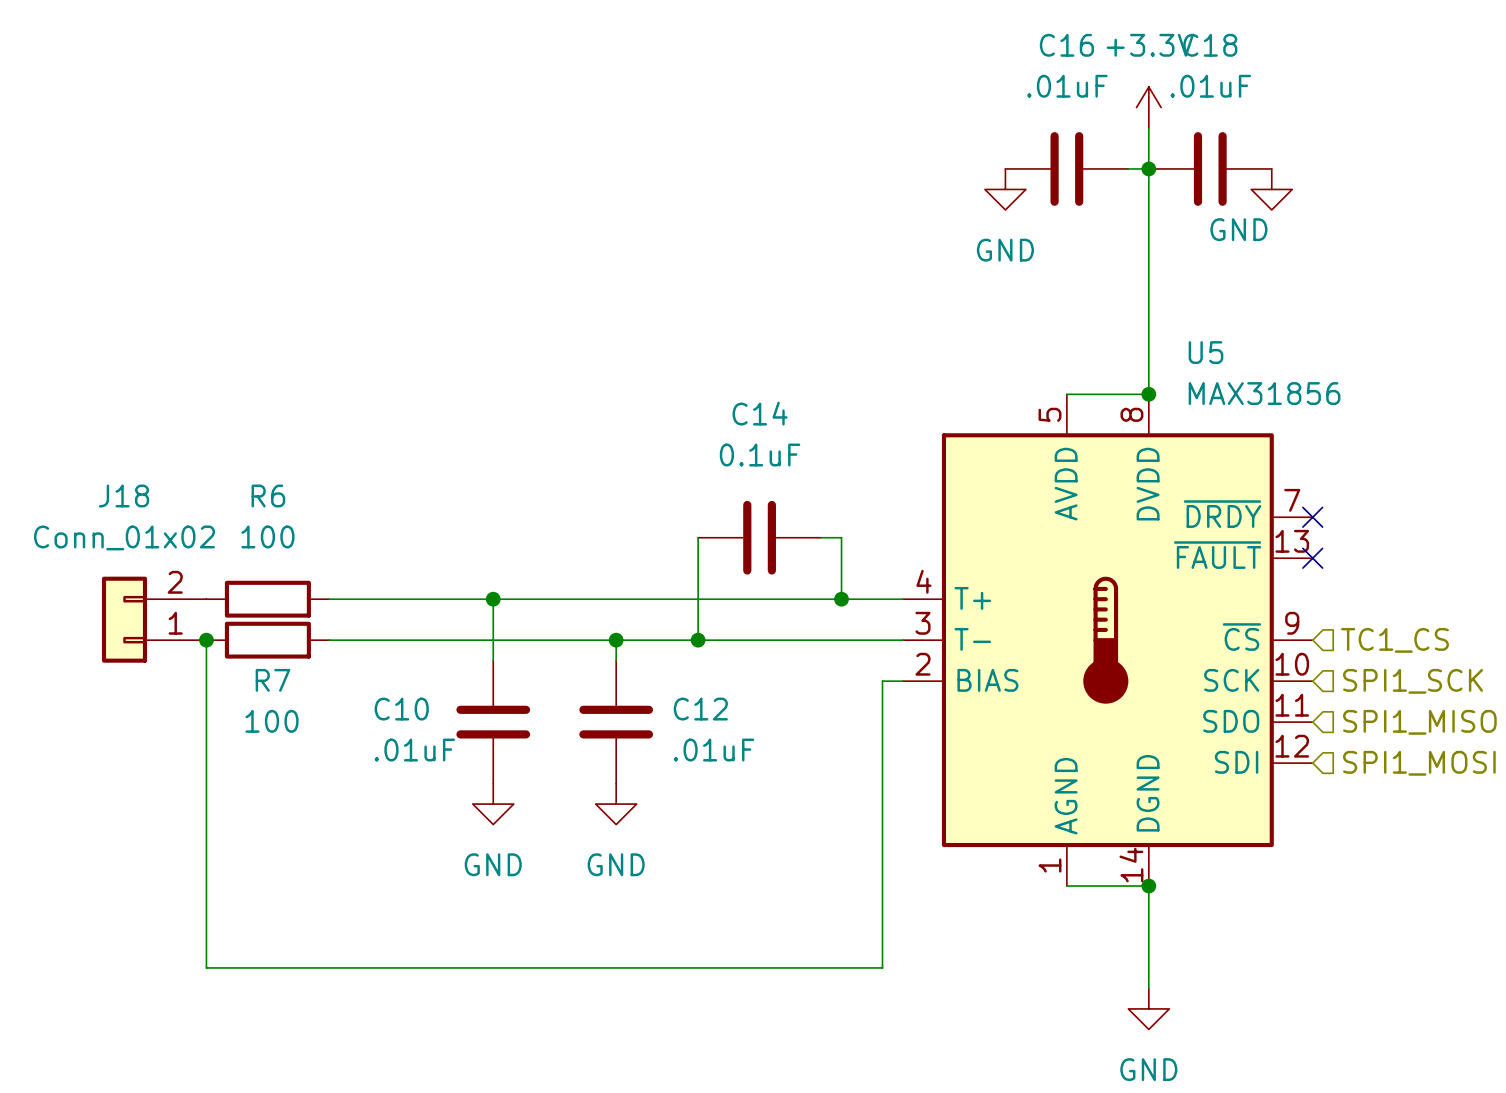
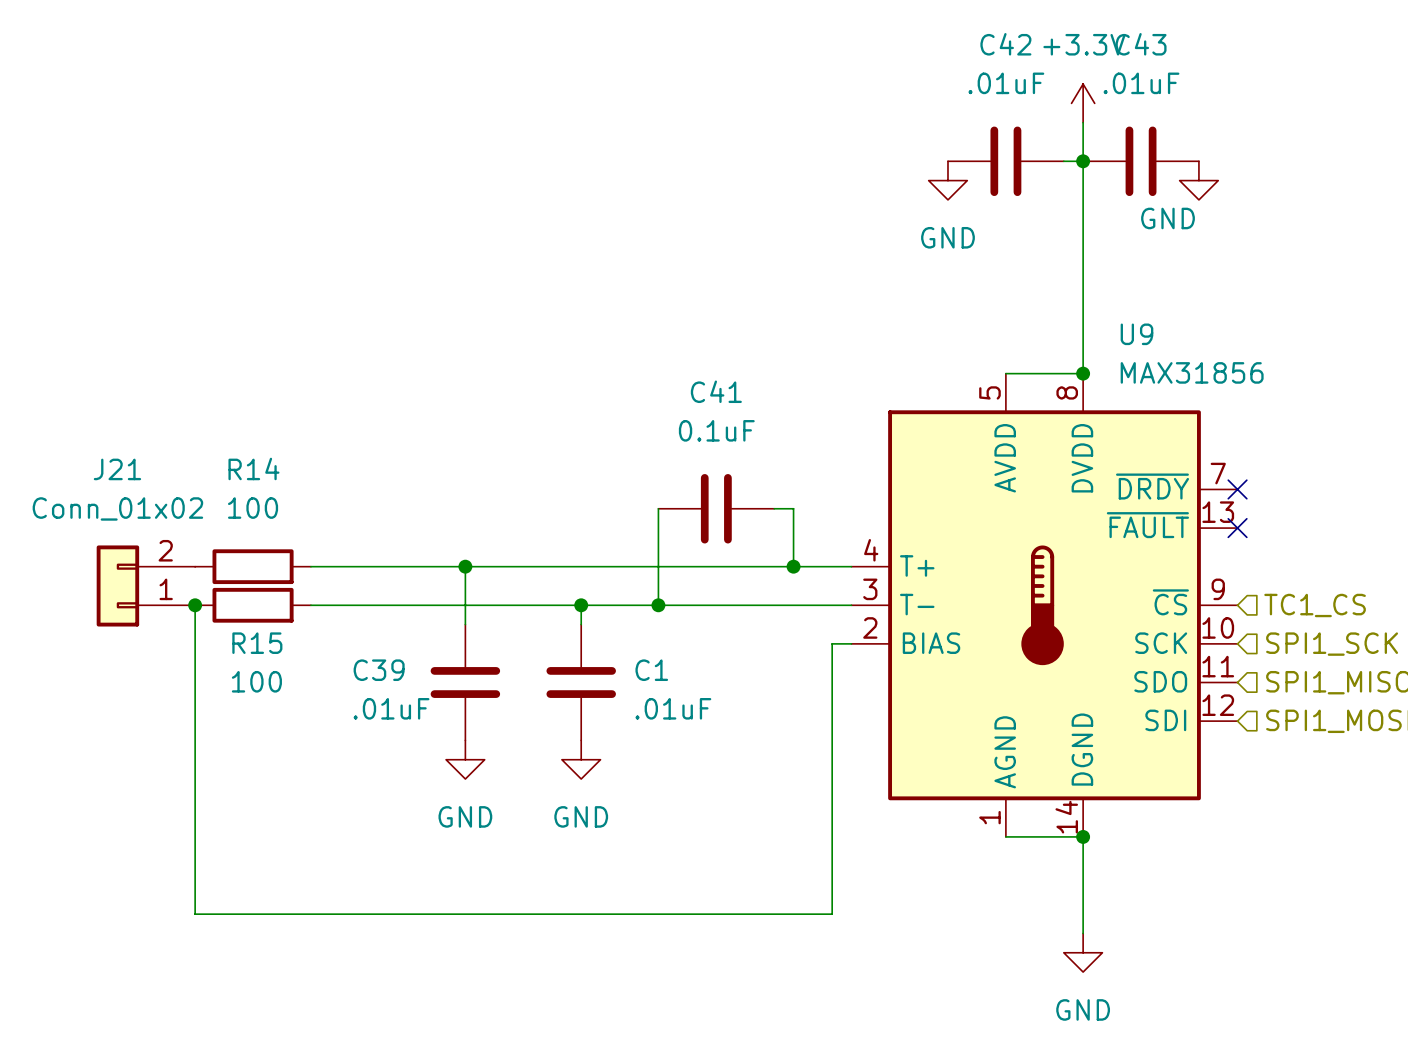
C16 name: C16 (1066, 45) -> C42 (1005, 44)
C18 name: C18 (1210, 45) -> C43 (1141, 44)
U5 name: U5 (1206, 352) -> U9 (1136, 334)
C14 name: C14 (760, 413) -> C41 (716, 391)
J18 name: J18 (124, 495) -> J21 (117, 469)
R6 name: R6 (268, 495) -> R14 (253, 468)
R7 name: R7 (272, 680) -> R15 (257, 643)
C10 name: C10 (401, 709) -> C39 (379, 670)
C12 name: C12 (700, 709) -> C1 (651, 670)

